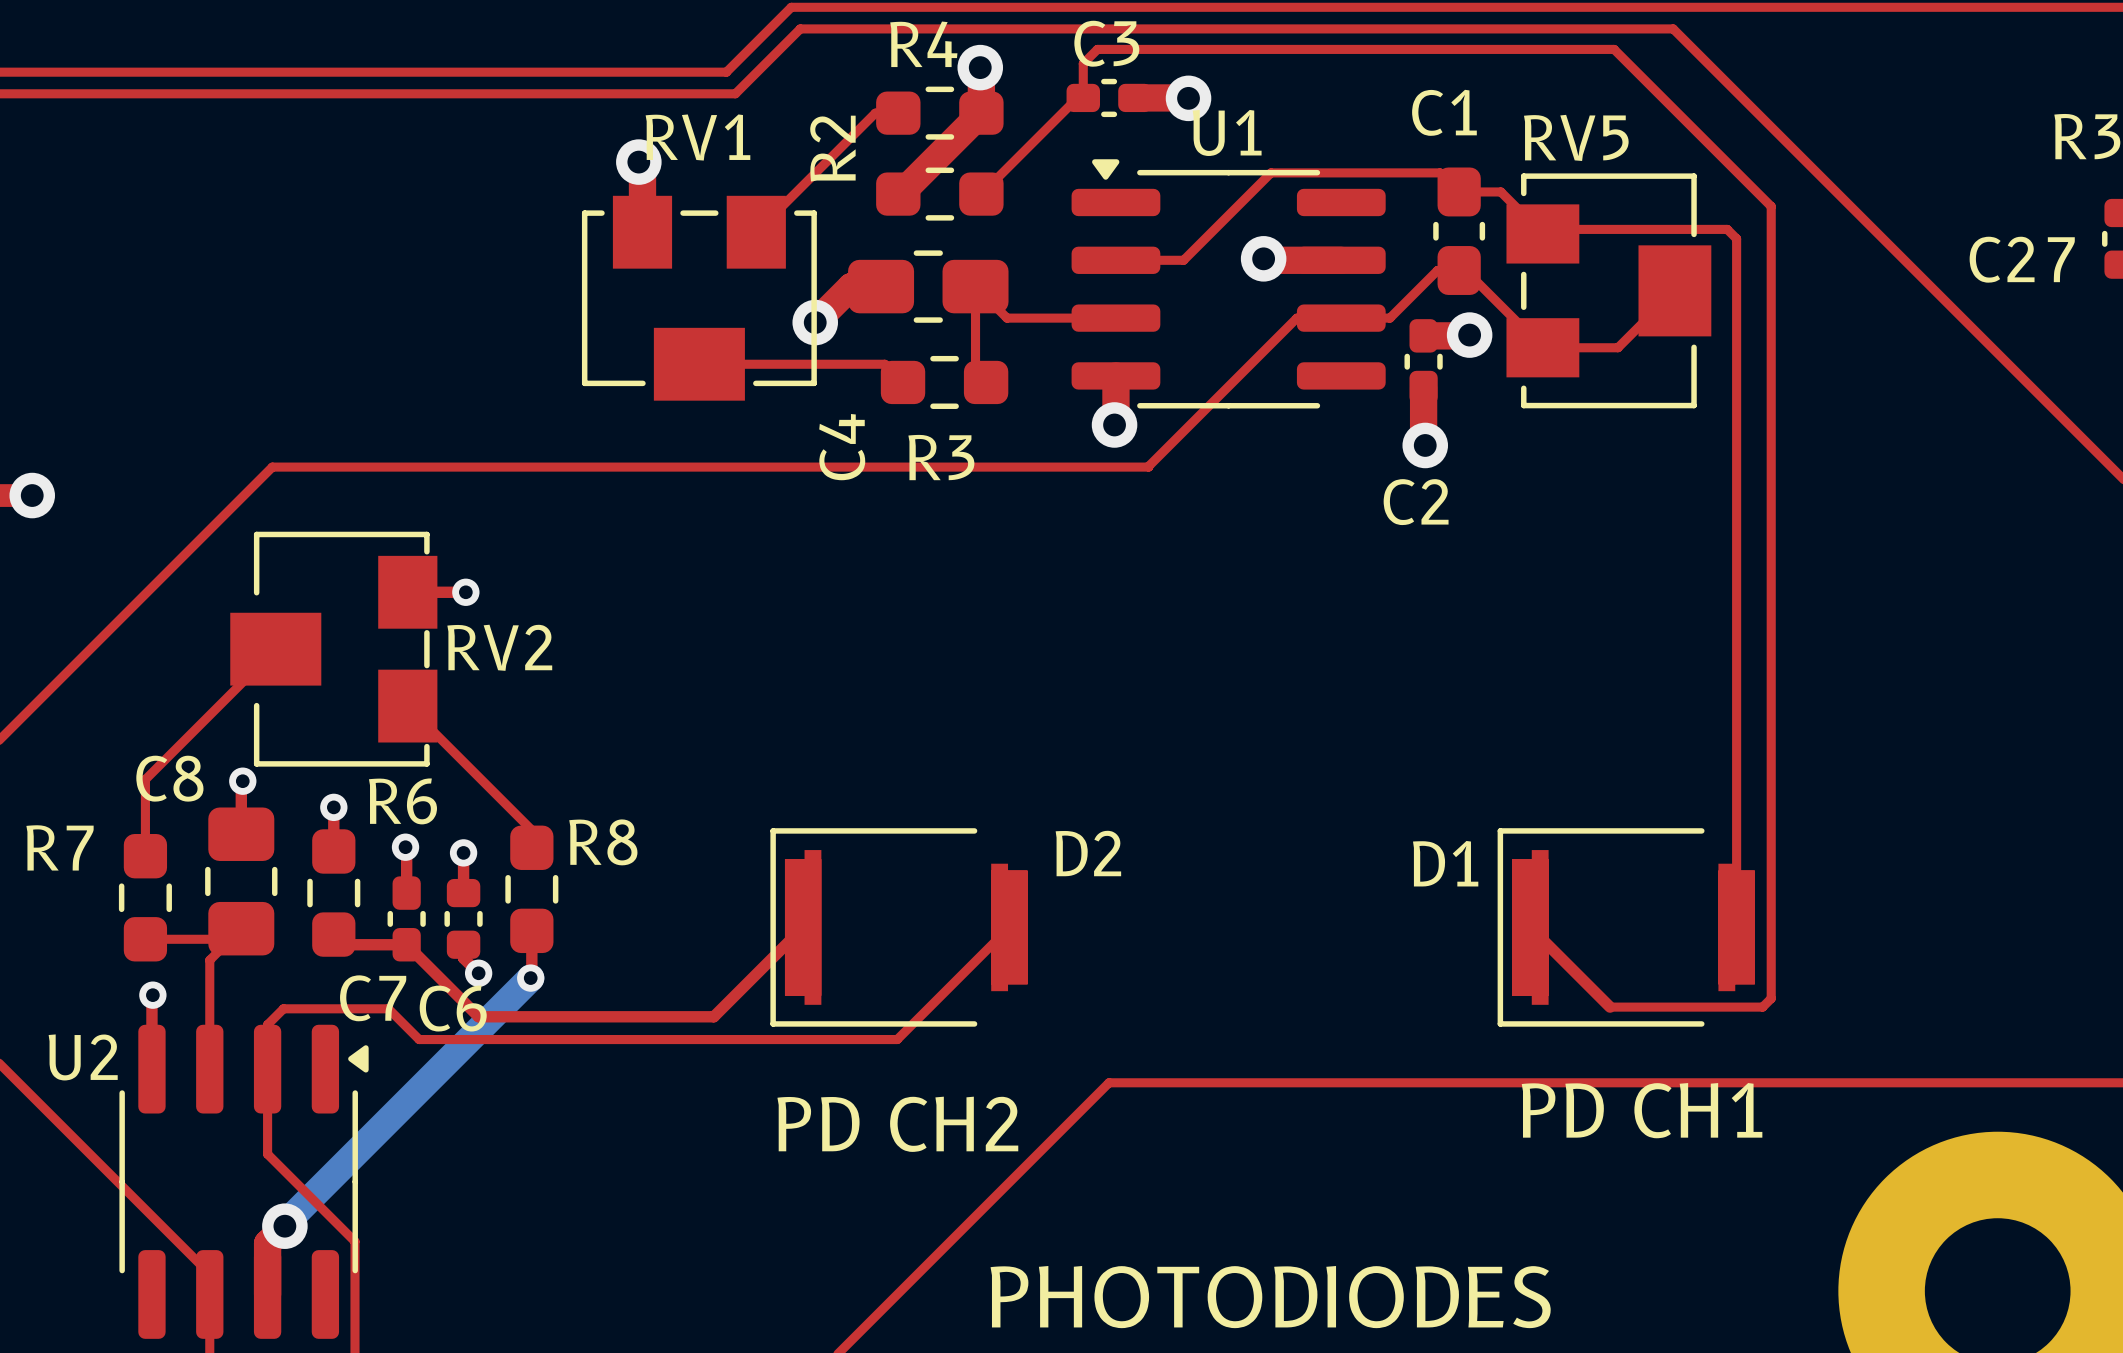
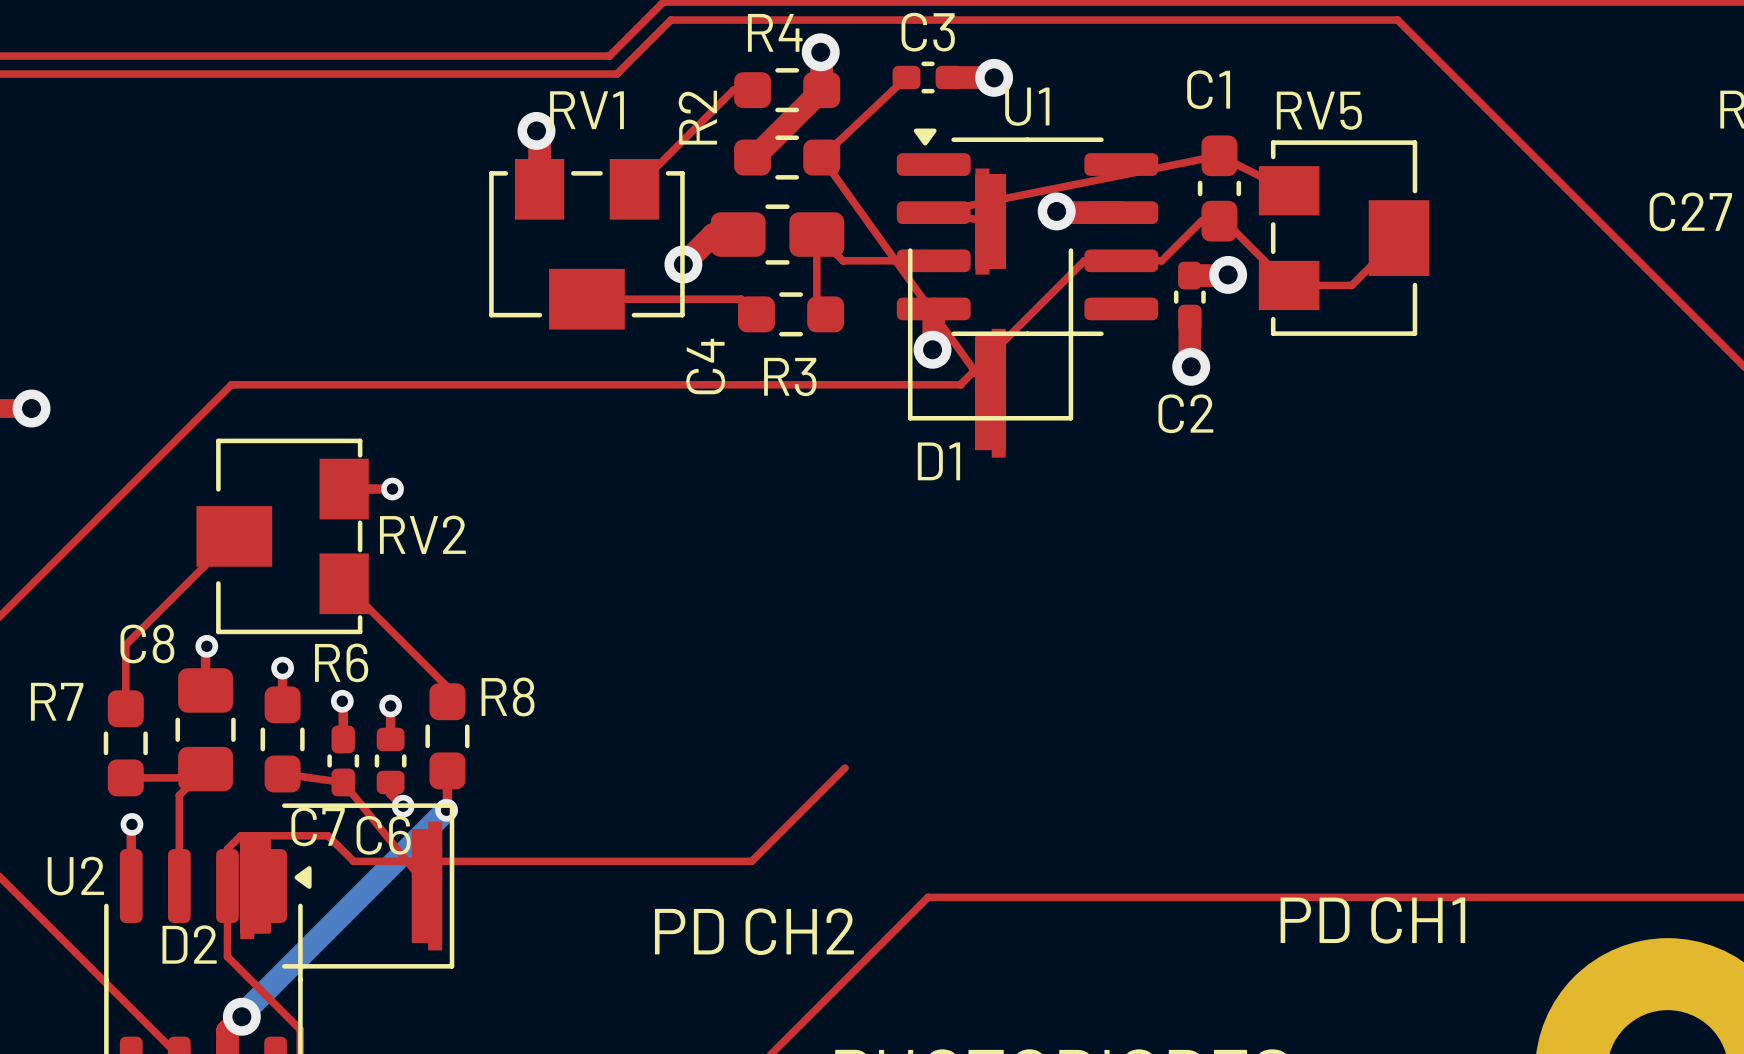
top track: none -> (906, 77) (821, 157) (990, 393)
top track: (981, 194) (1077, 97) (1083, 97) (1083, 63) (1097, 49) (1614, 49) (1771, 206) (1771, 998) (1762, 1007) (1610, 1007) (1530, 927) -> none
top track: none -> (1289, 190) (1219, 155) (933, 212) (990, 221)
top track: (1115, 260) (1183, 260) (1271, 172) (1440, 172) (1459, 191) (1500, 191) (1542, 233) (1547, 229) (1727, 229) (1736, 238) (1736, 927) -> none
D2 footprint: [770, 828, 1028, 1027] -> [240, 803, 455, 969]
D1 footprint: [1497, 828, 1755, 1027] -> [907, 168, 1074, 458]
D2 name position: D2 (1088, 853) -> D2 (189, 944)
D1 name position: D1 (1445, 863) -> D1 (938, 461)
top track: (803, 927) (713, 1016) (478, 1016) (406, 944) (343, 944) (333, 934) -> (427, 886) (343, 782) (282, 773)

